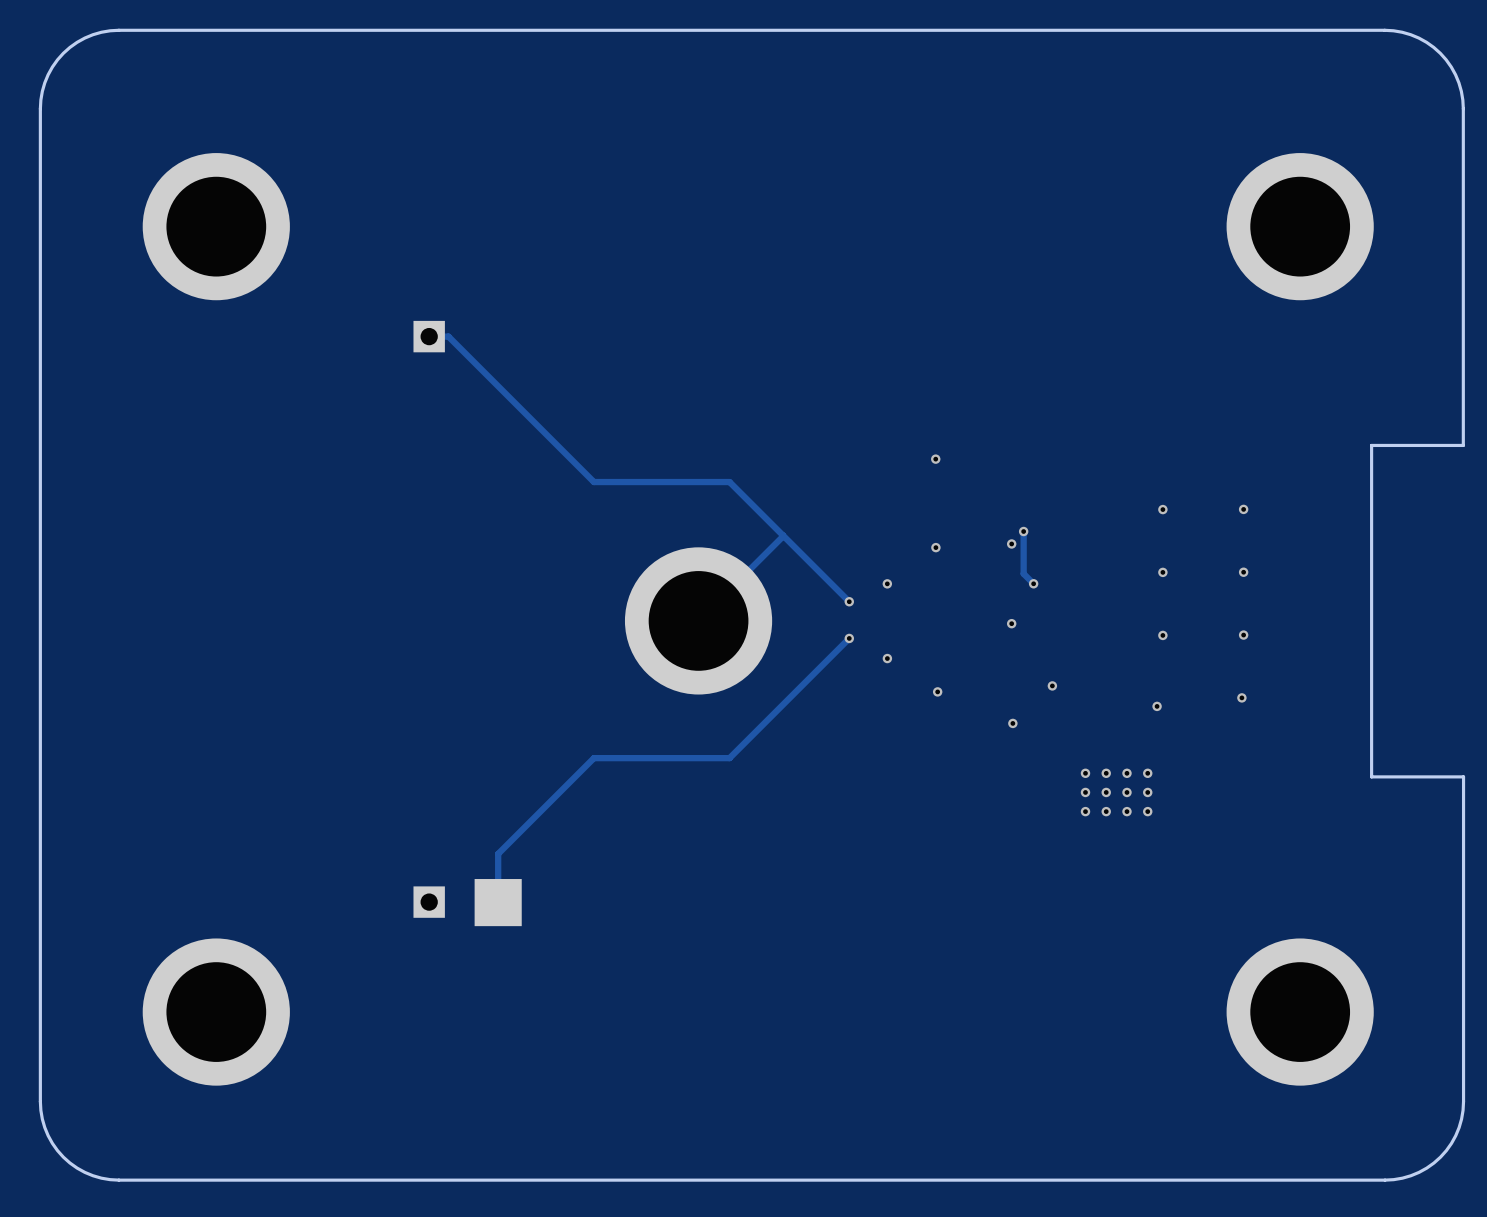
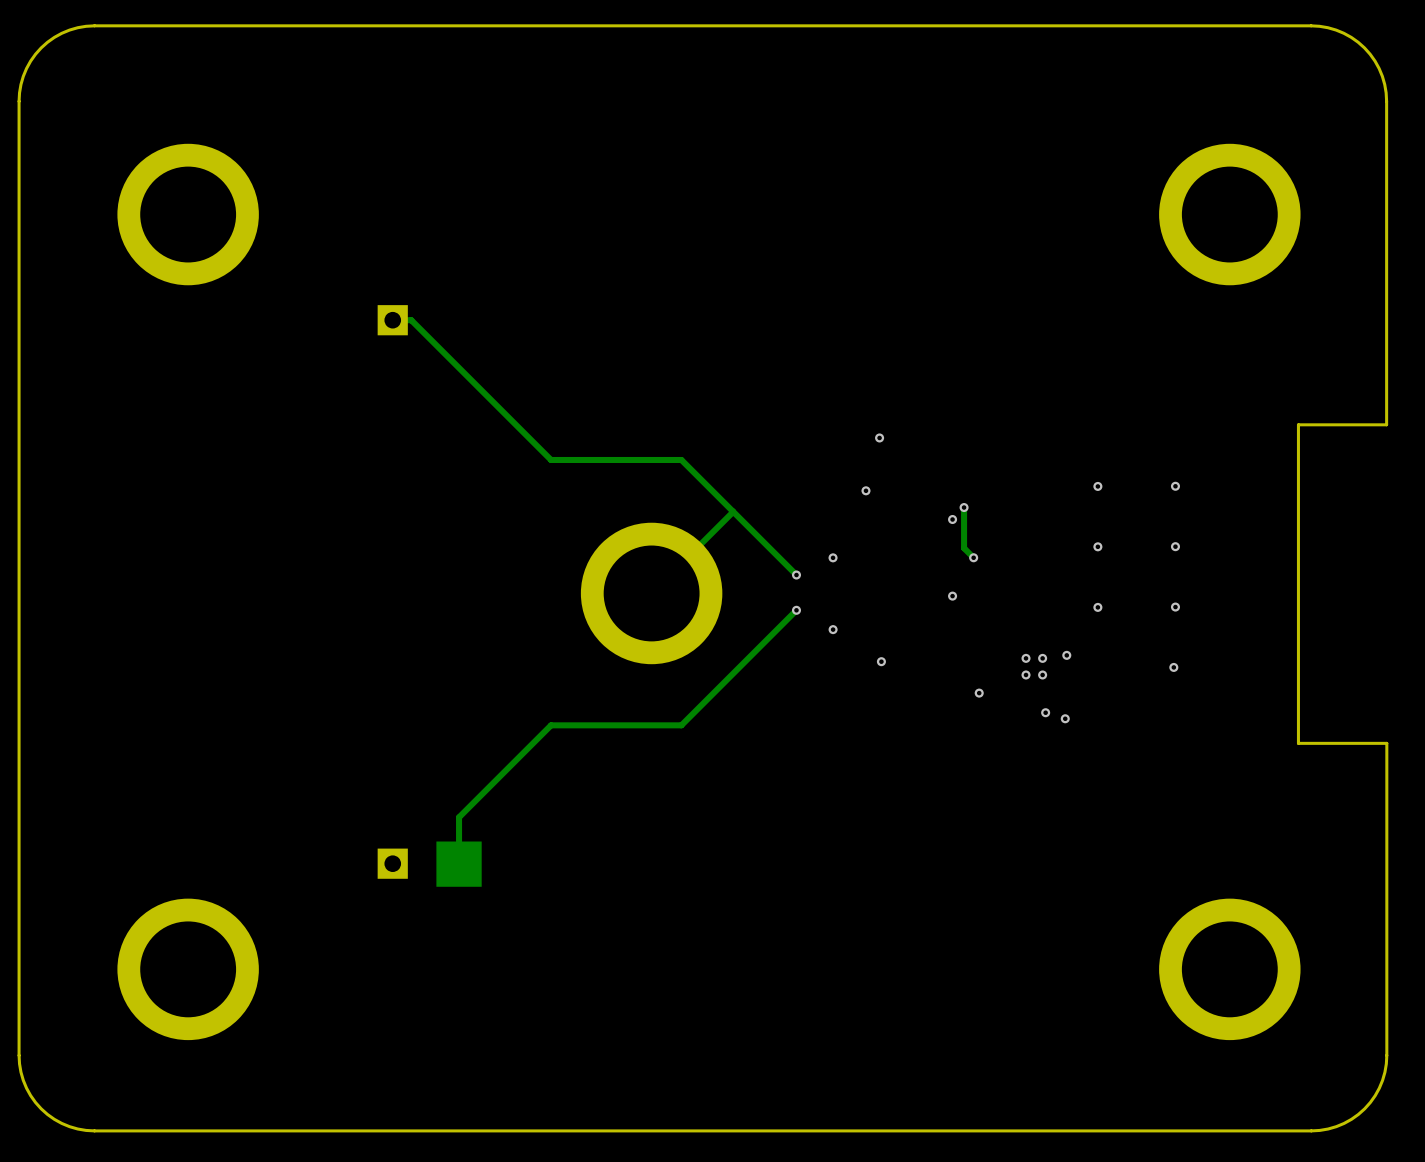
via position: (935, 547) -> (865, 490)
via: (1052, 685) -> none
via: none -> (1066, 655)
via: none -> (1026, 658)
via: none -> (1042, 658)
via: none -> (1026, 674)
via: none -> (1042, 674)
via: (1157, 706) -> none
via: (1012, 723) -> none
via: none -> (979, 693)
via: none -> (1045, 712)
via: none -> (1065, 718)
via: (1085, 773) -> none
via: (1106, 773) -> none
via: (1126, 773) -> none
via: (1147, 773) -> none
via: (1085, 792) -> none
via: (1106, 792) -> none
via: (1126, 792) -> none
via: (1147, 792) -> none
via: (1085, 811) -> none
via: (1106, 811) -> none
via: (1126, 811) -> none
via: (1147, 811) -> none

